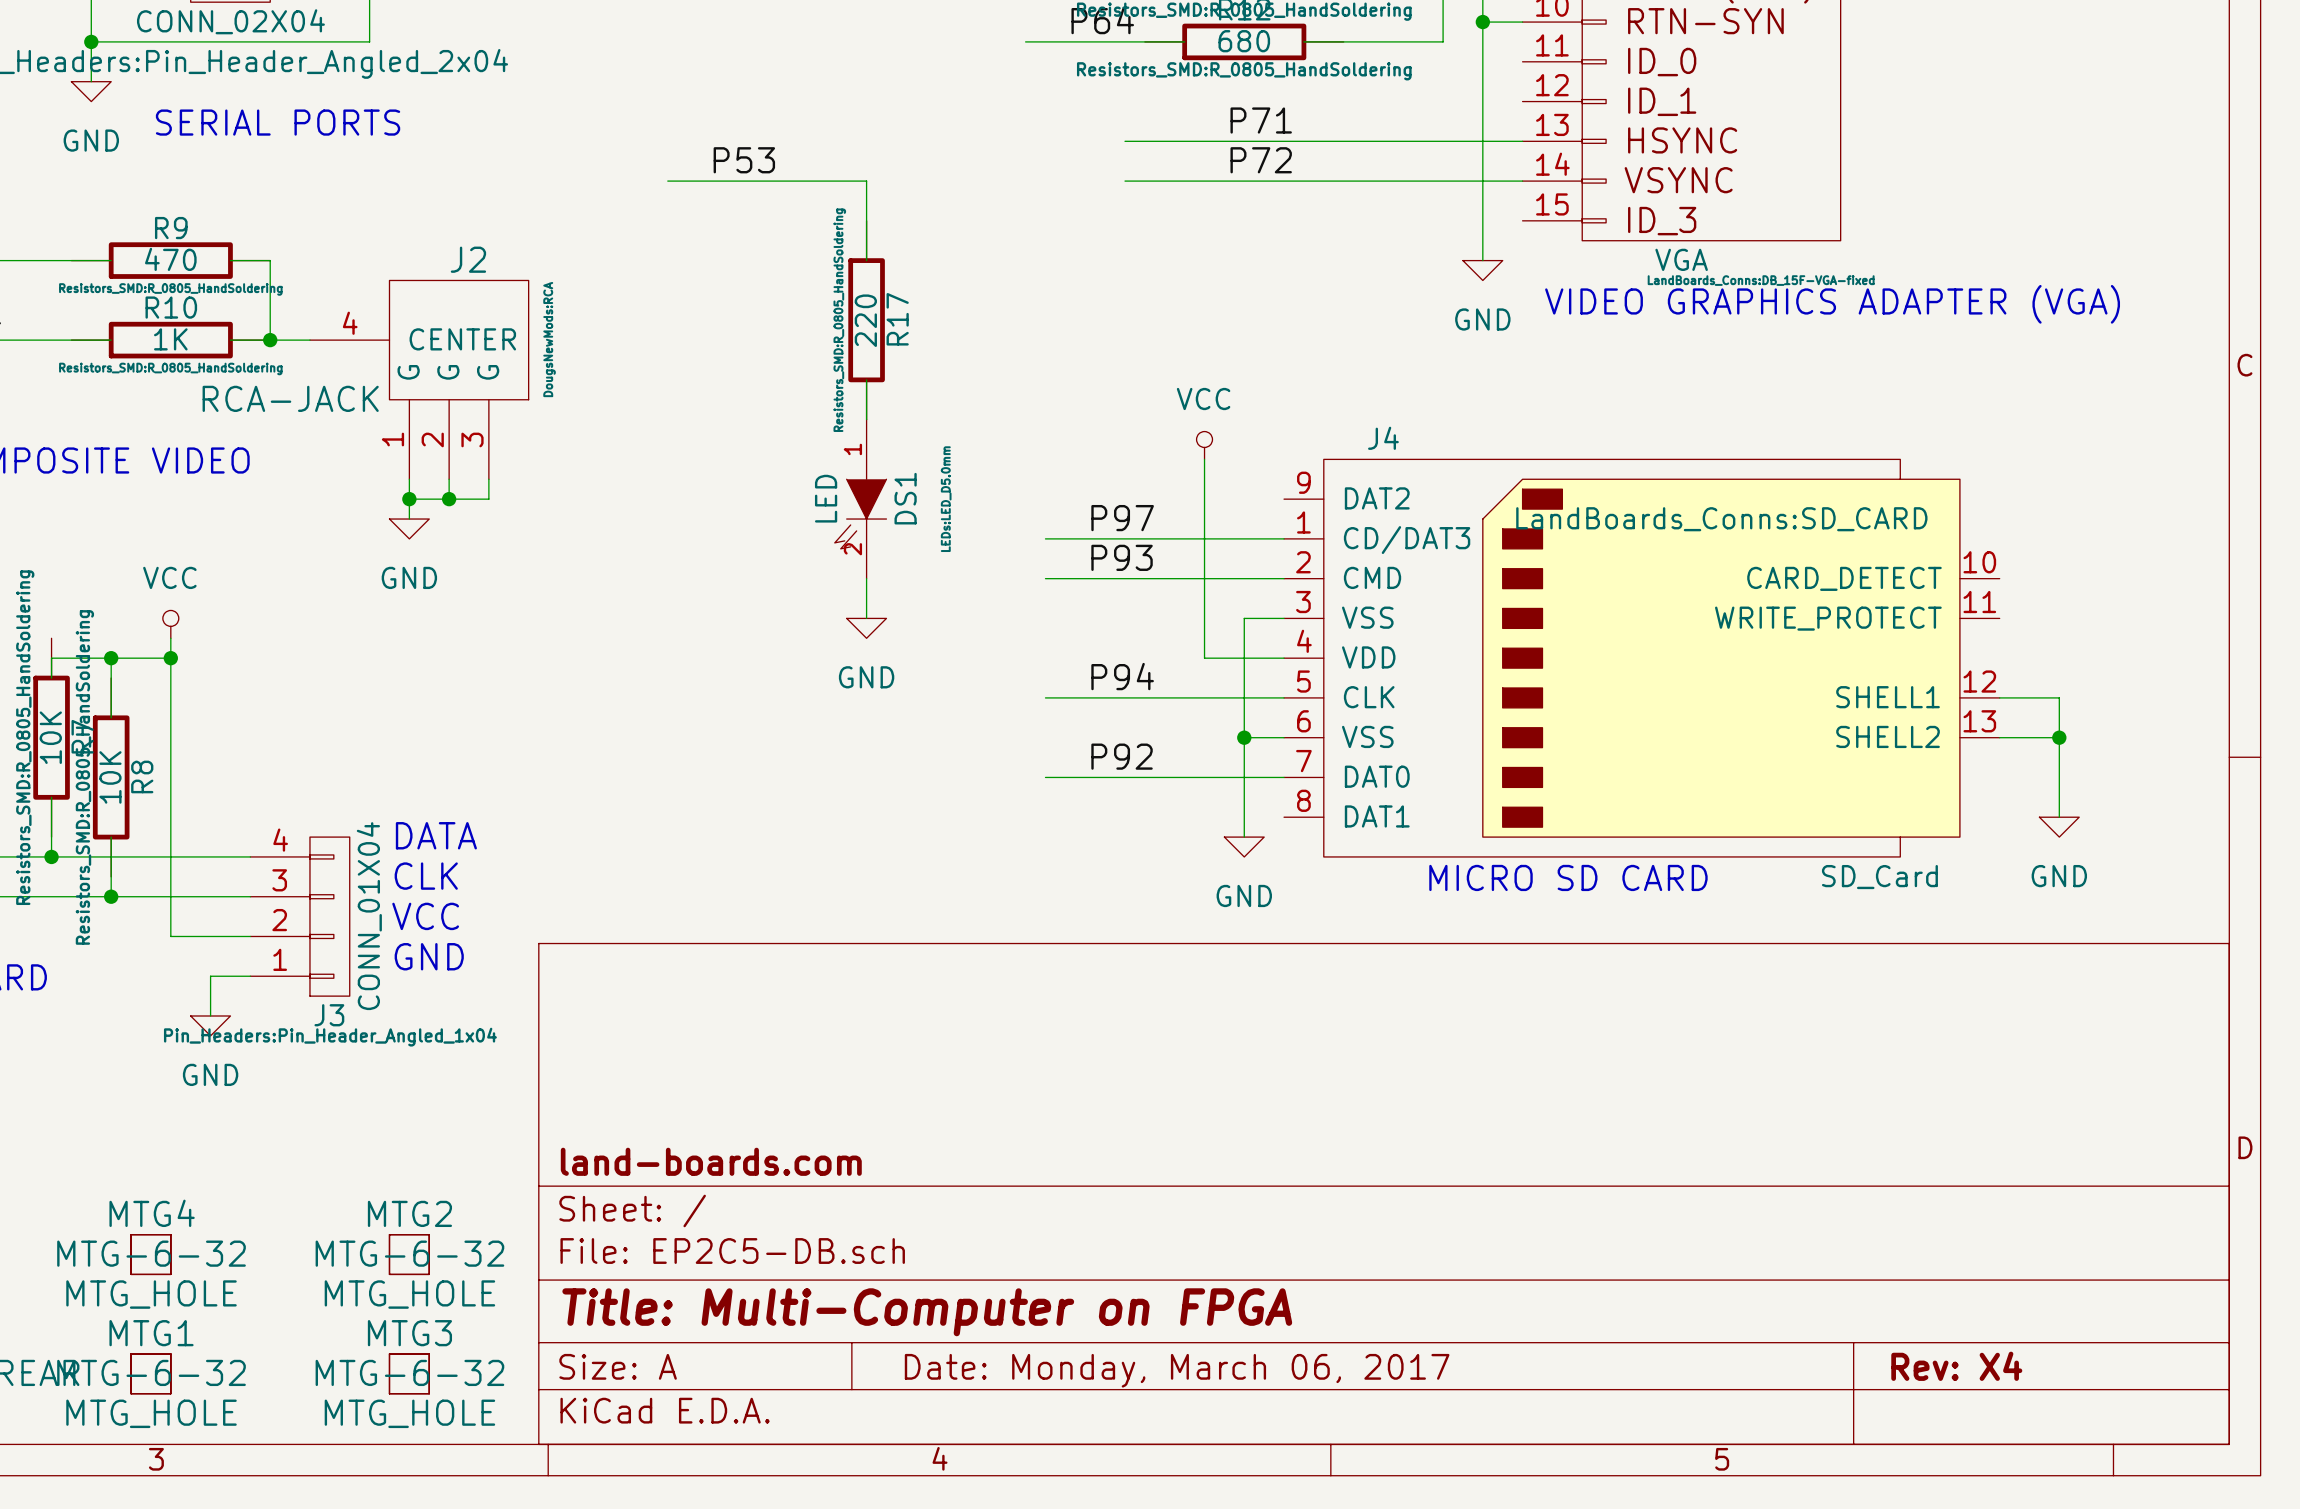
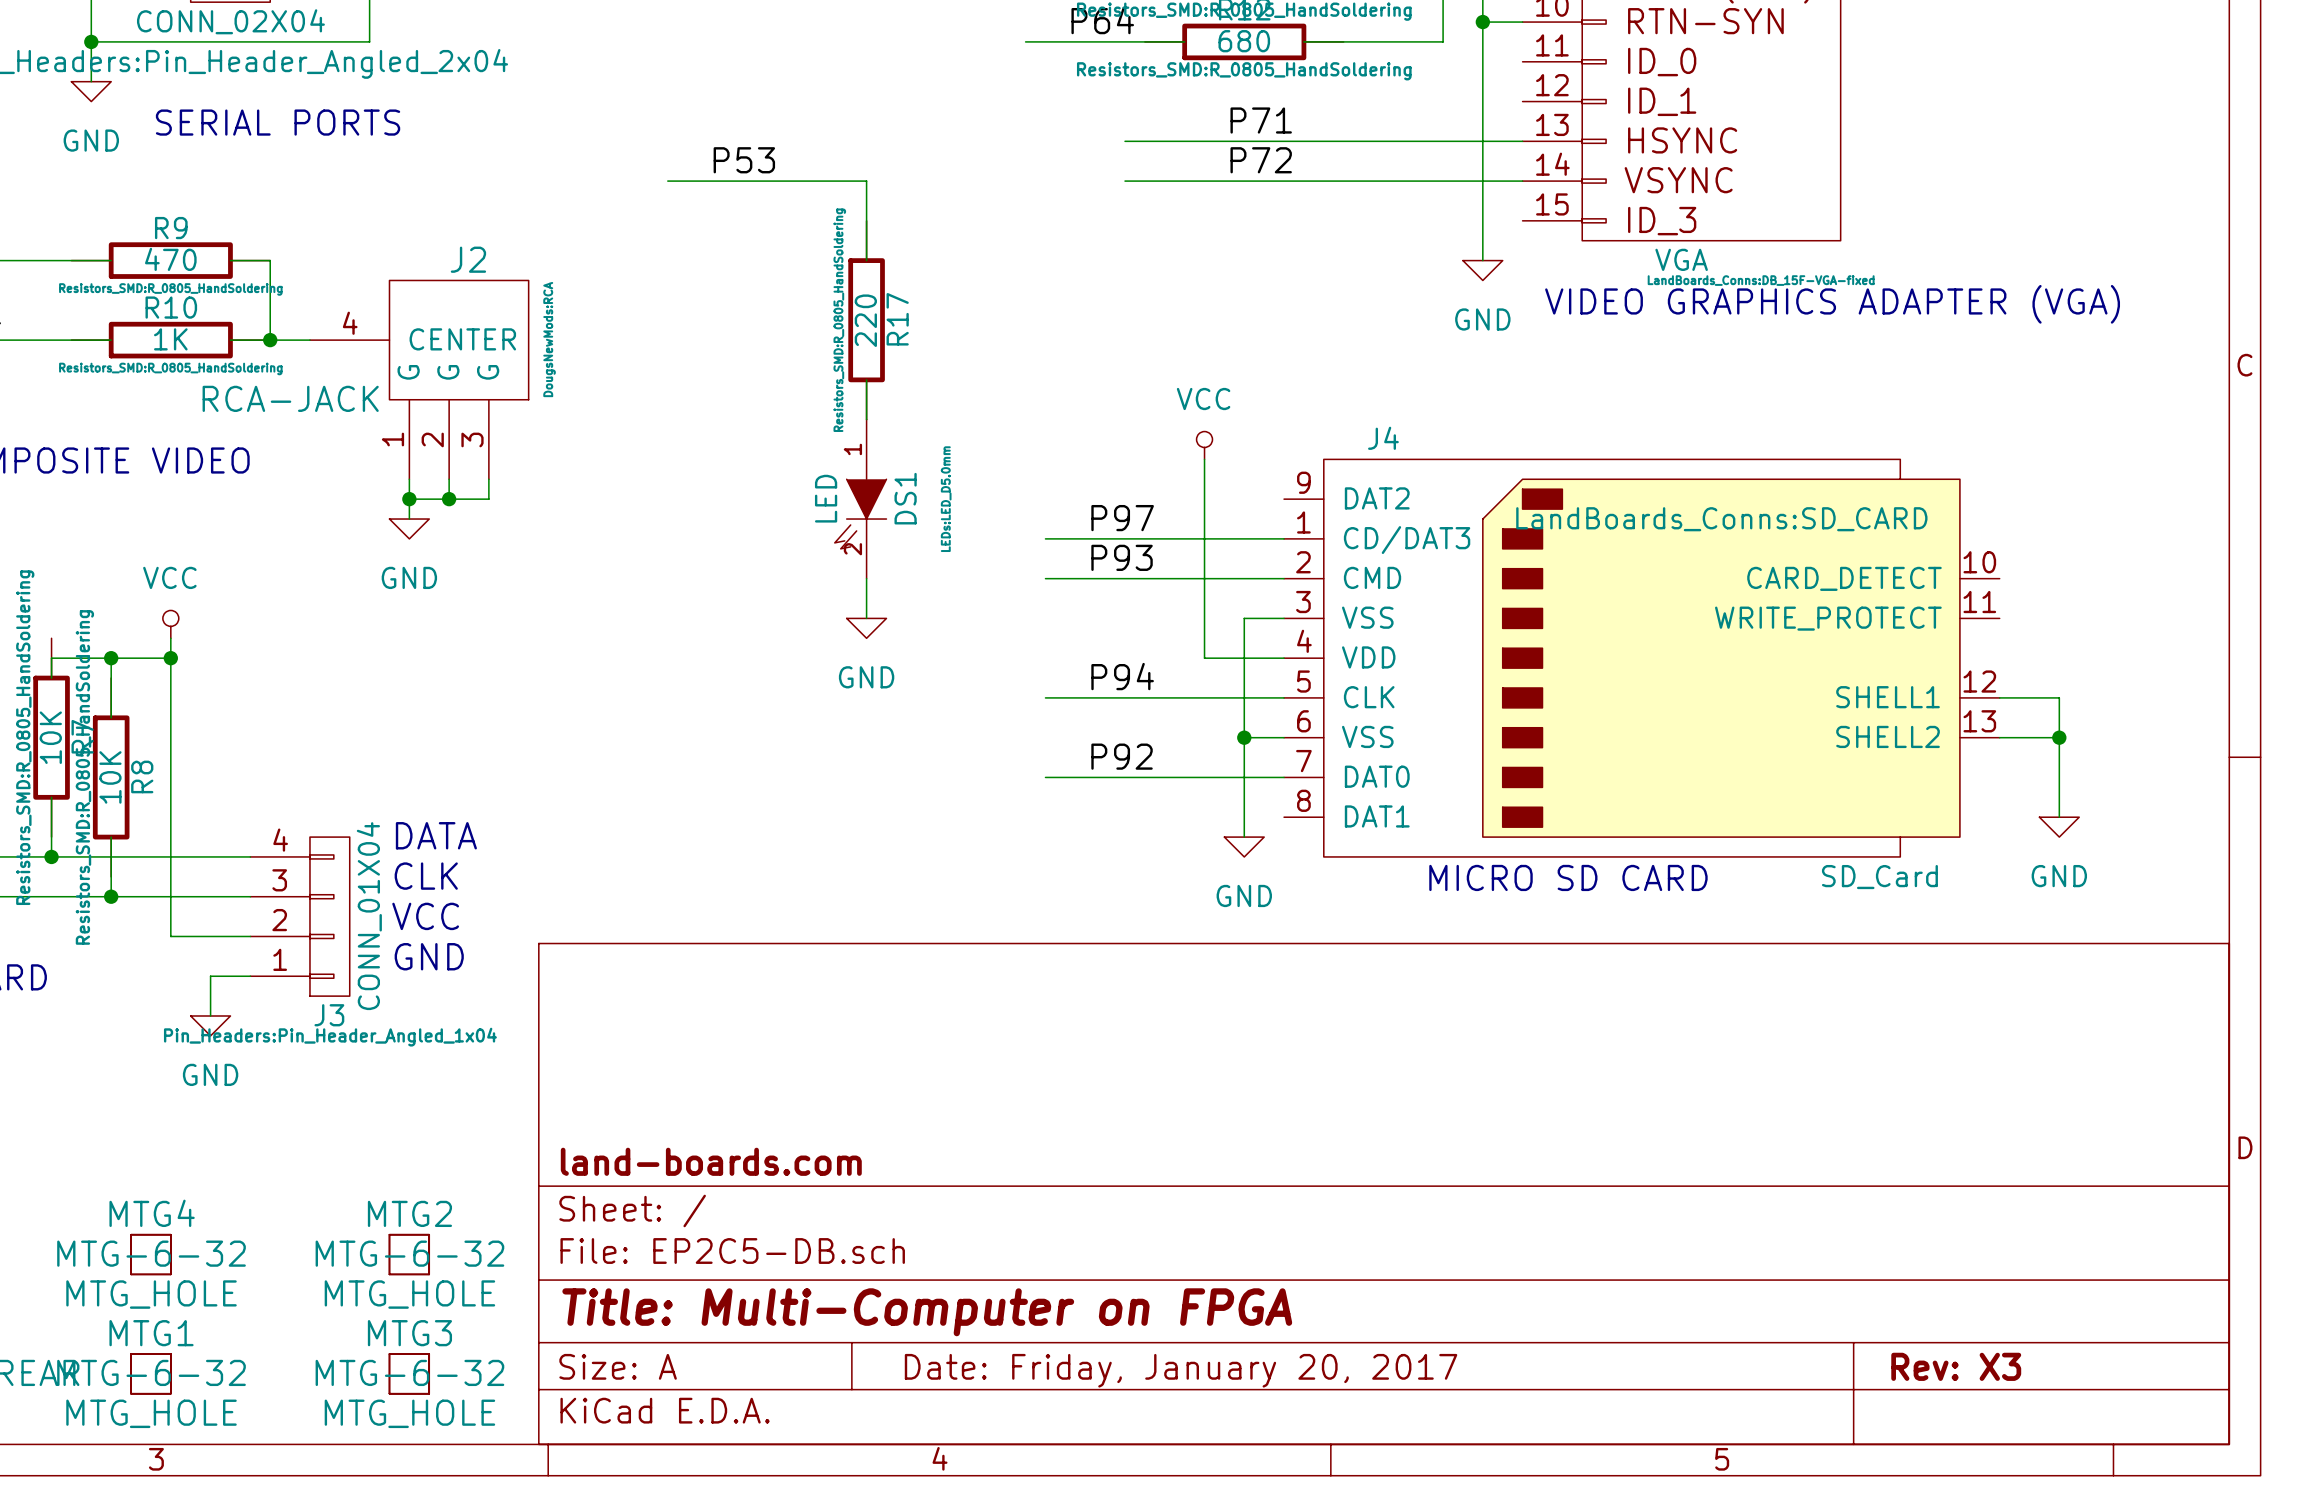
title block: Rev: X4 (1956, 1366) -> Rev: X3 (1956, 1366)
title block: Date: Monday, March 06, 2017 (1177, 1370) -> Date: Friday, January 20, 2017 (1181, 1370)

